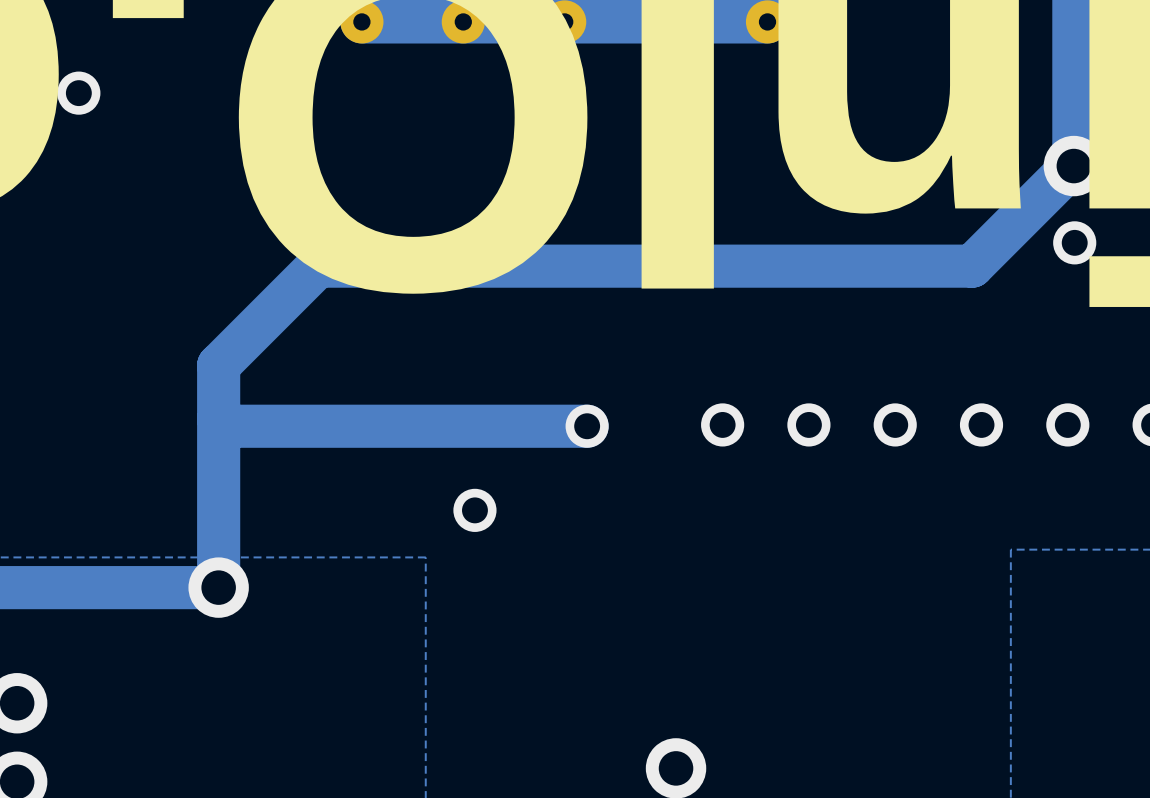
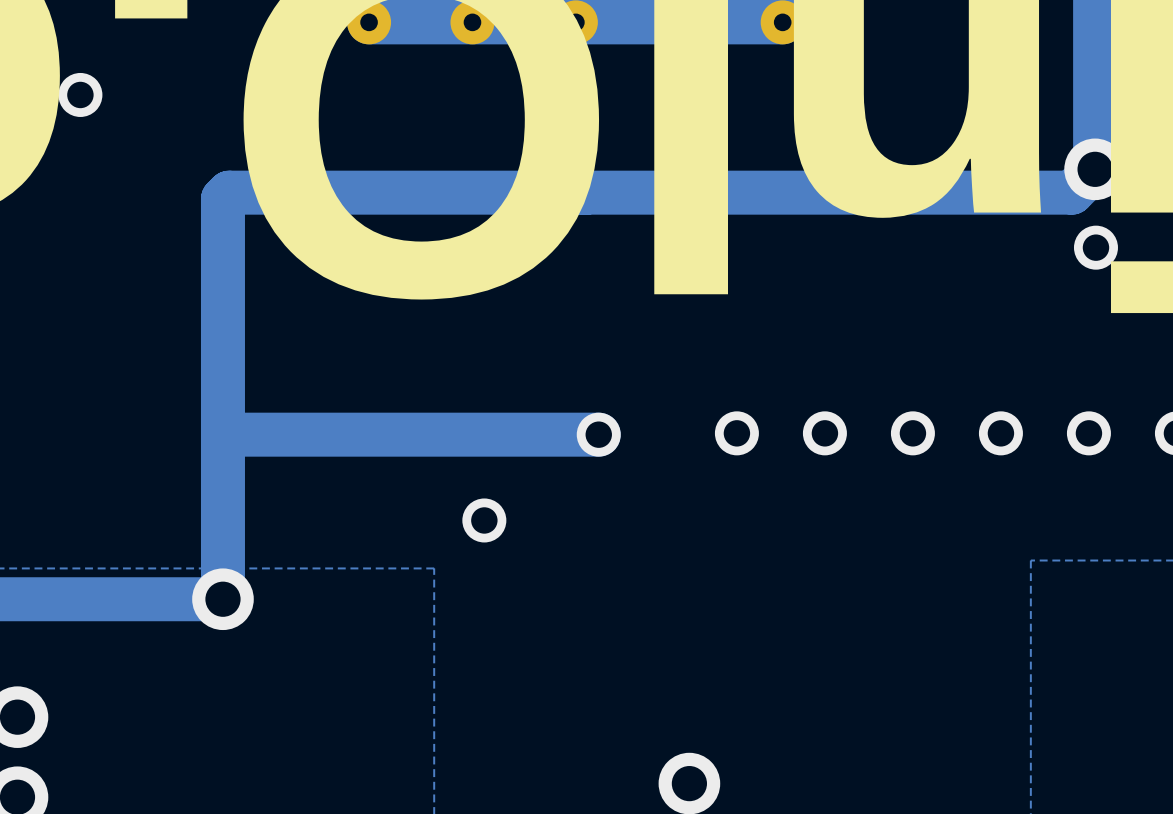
track: (1072, 166) (972, 266) (317, 266) (218, 365) -> (1095, 169) (1071, 192) (229, 192) (222, 198) (222, 372)

